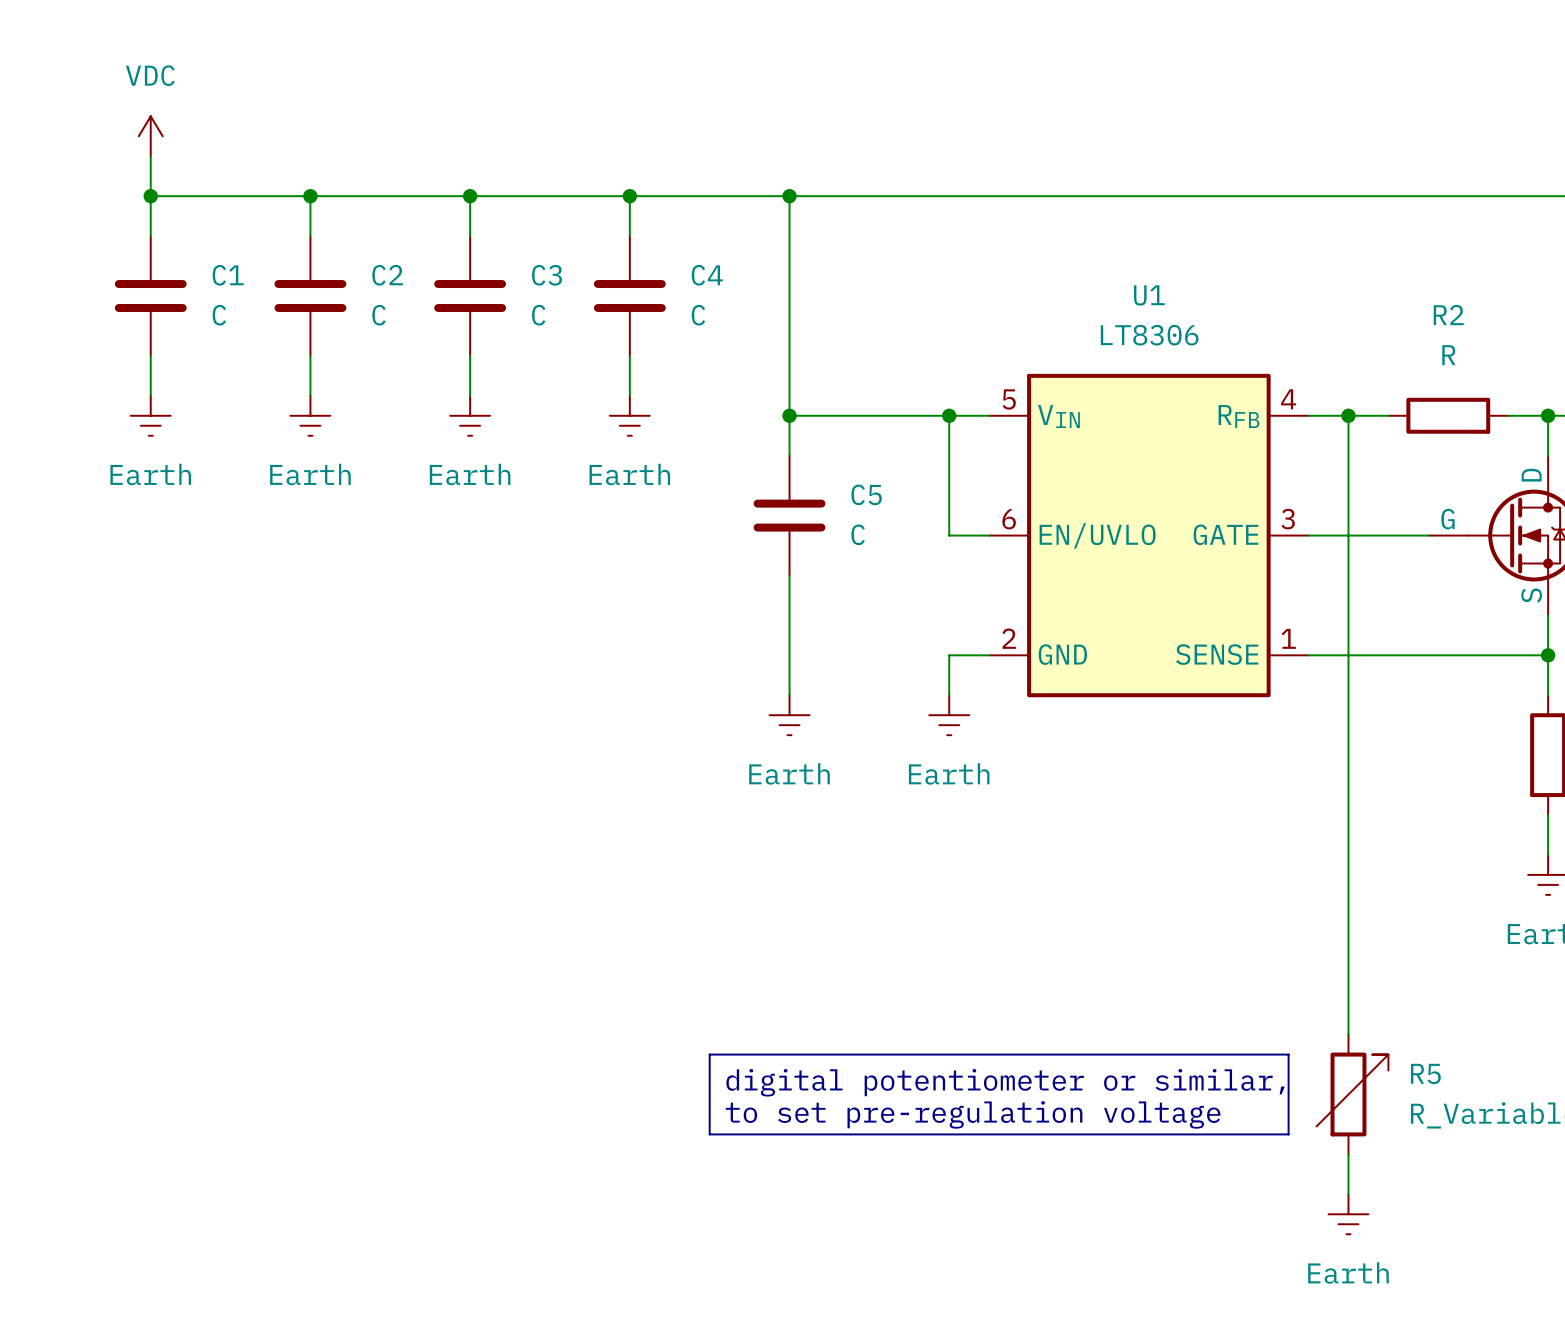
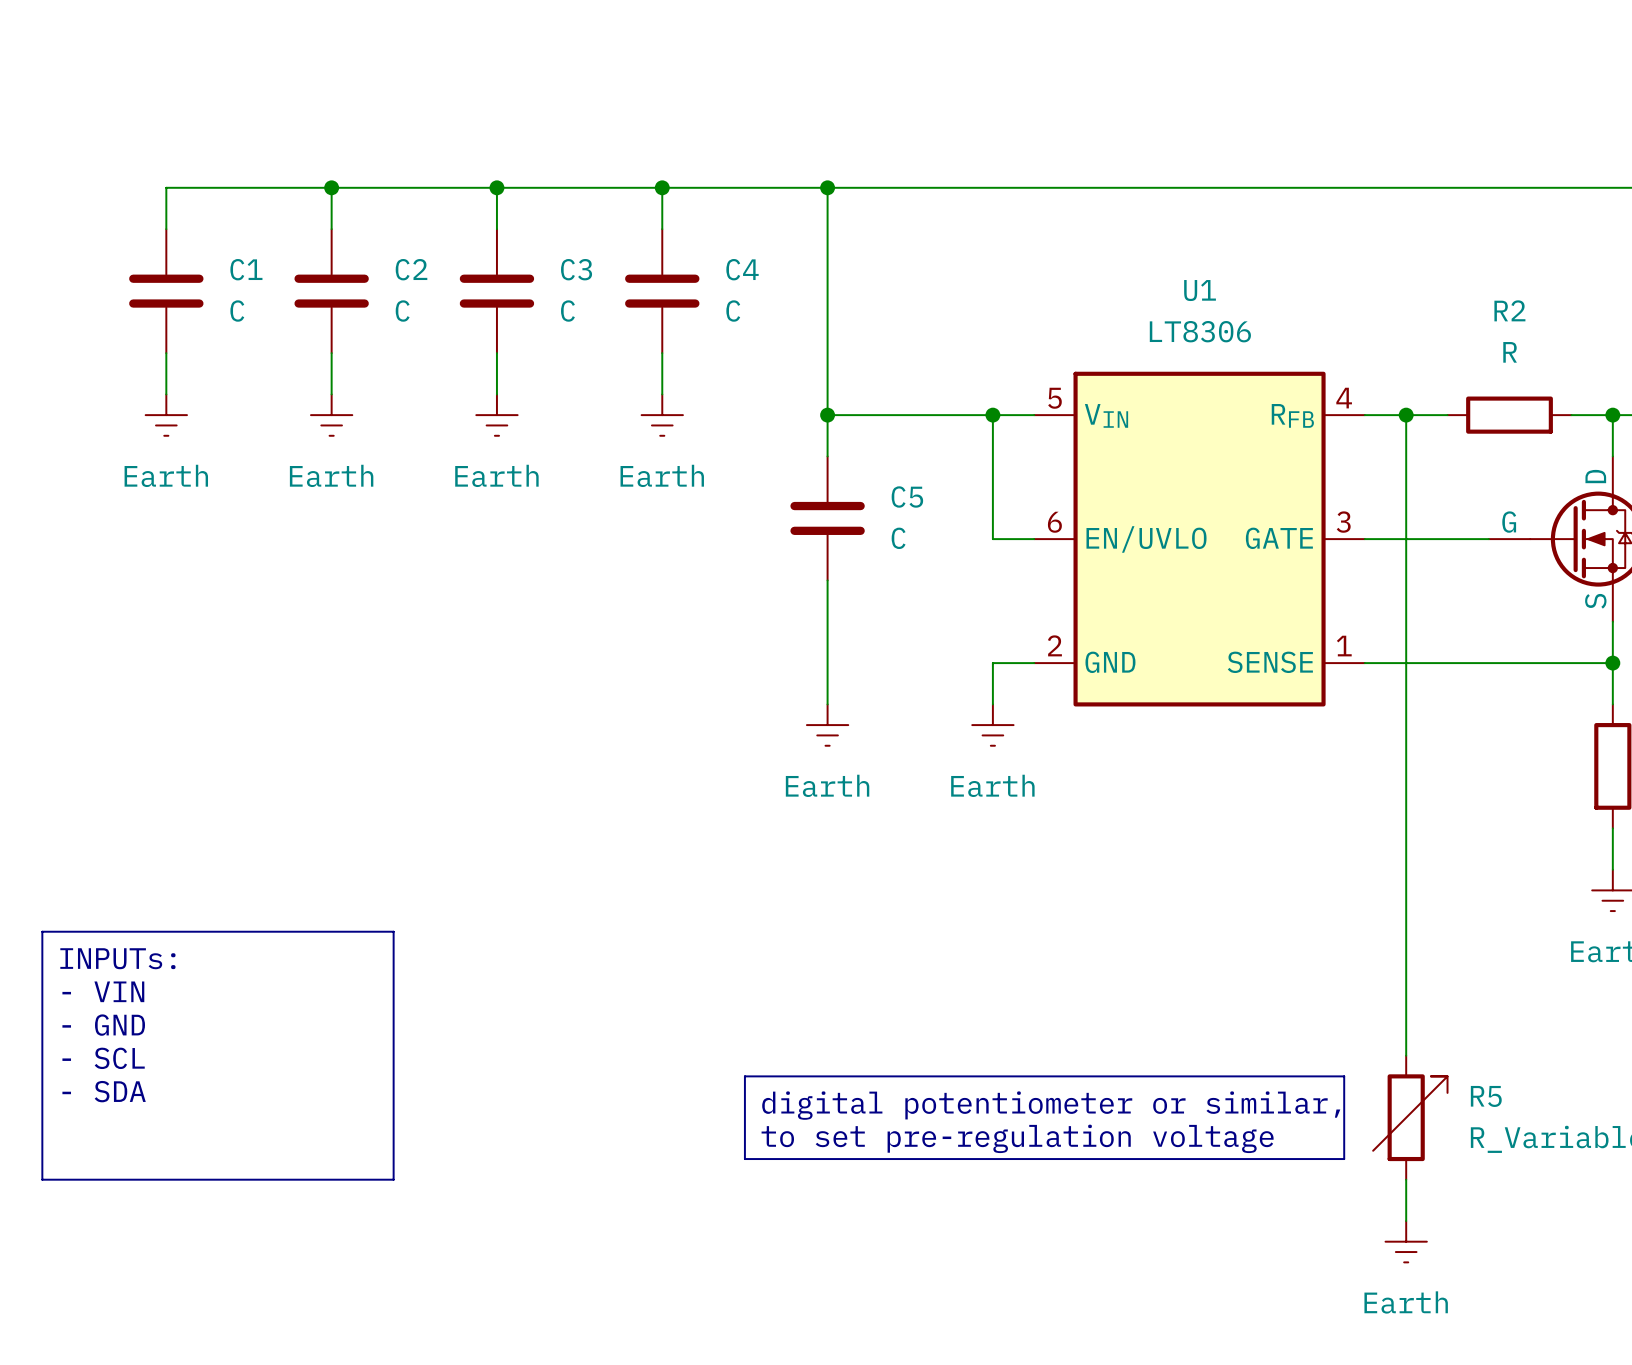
power symbol: VDC (150, 136) -> none
wire: (150, 156) (150, 196) -> none
junction: (150, 196) -> none
line: none -> (42, 931) (393, 931) (393, 1179) (42, 1179) (42, 931)
text: none -> INPUTs: (117, 958)
text: none -> - VIN (103, 991)
text: none -> - GND (103, 1025)
text: none -> - SCL (103, 1058)
text: none -> - SDA (104, 1091)

